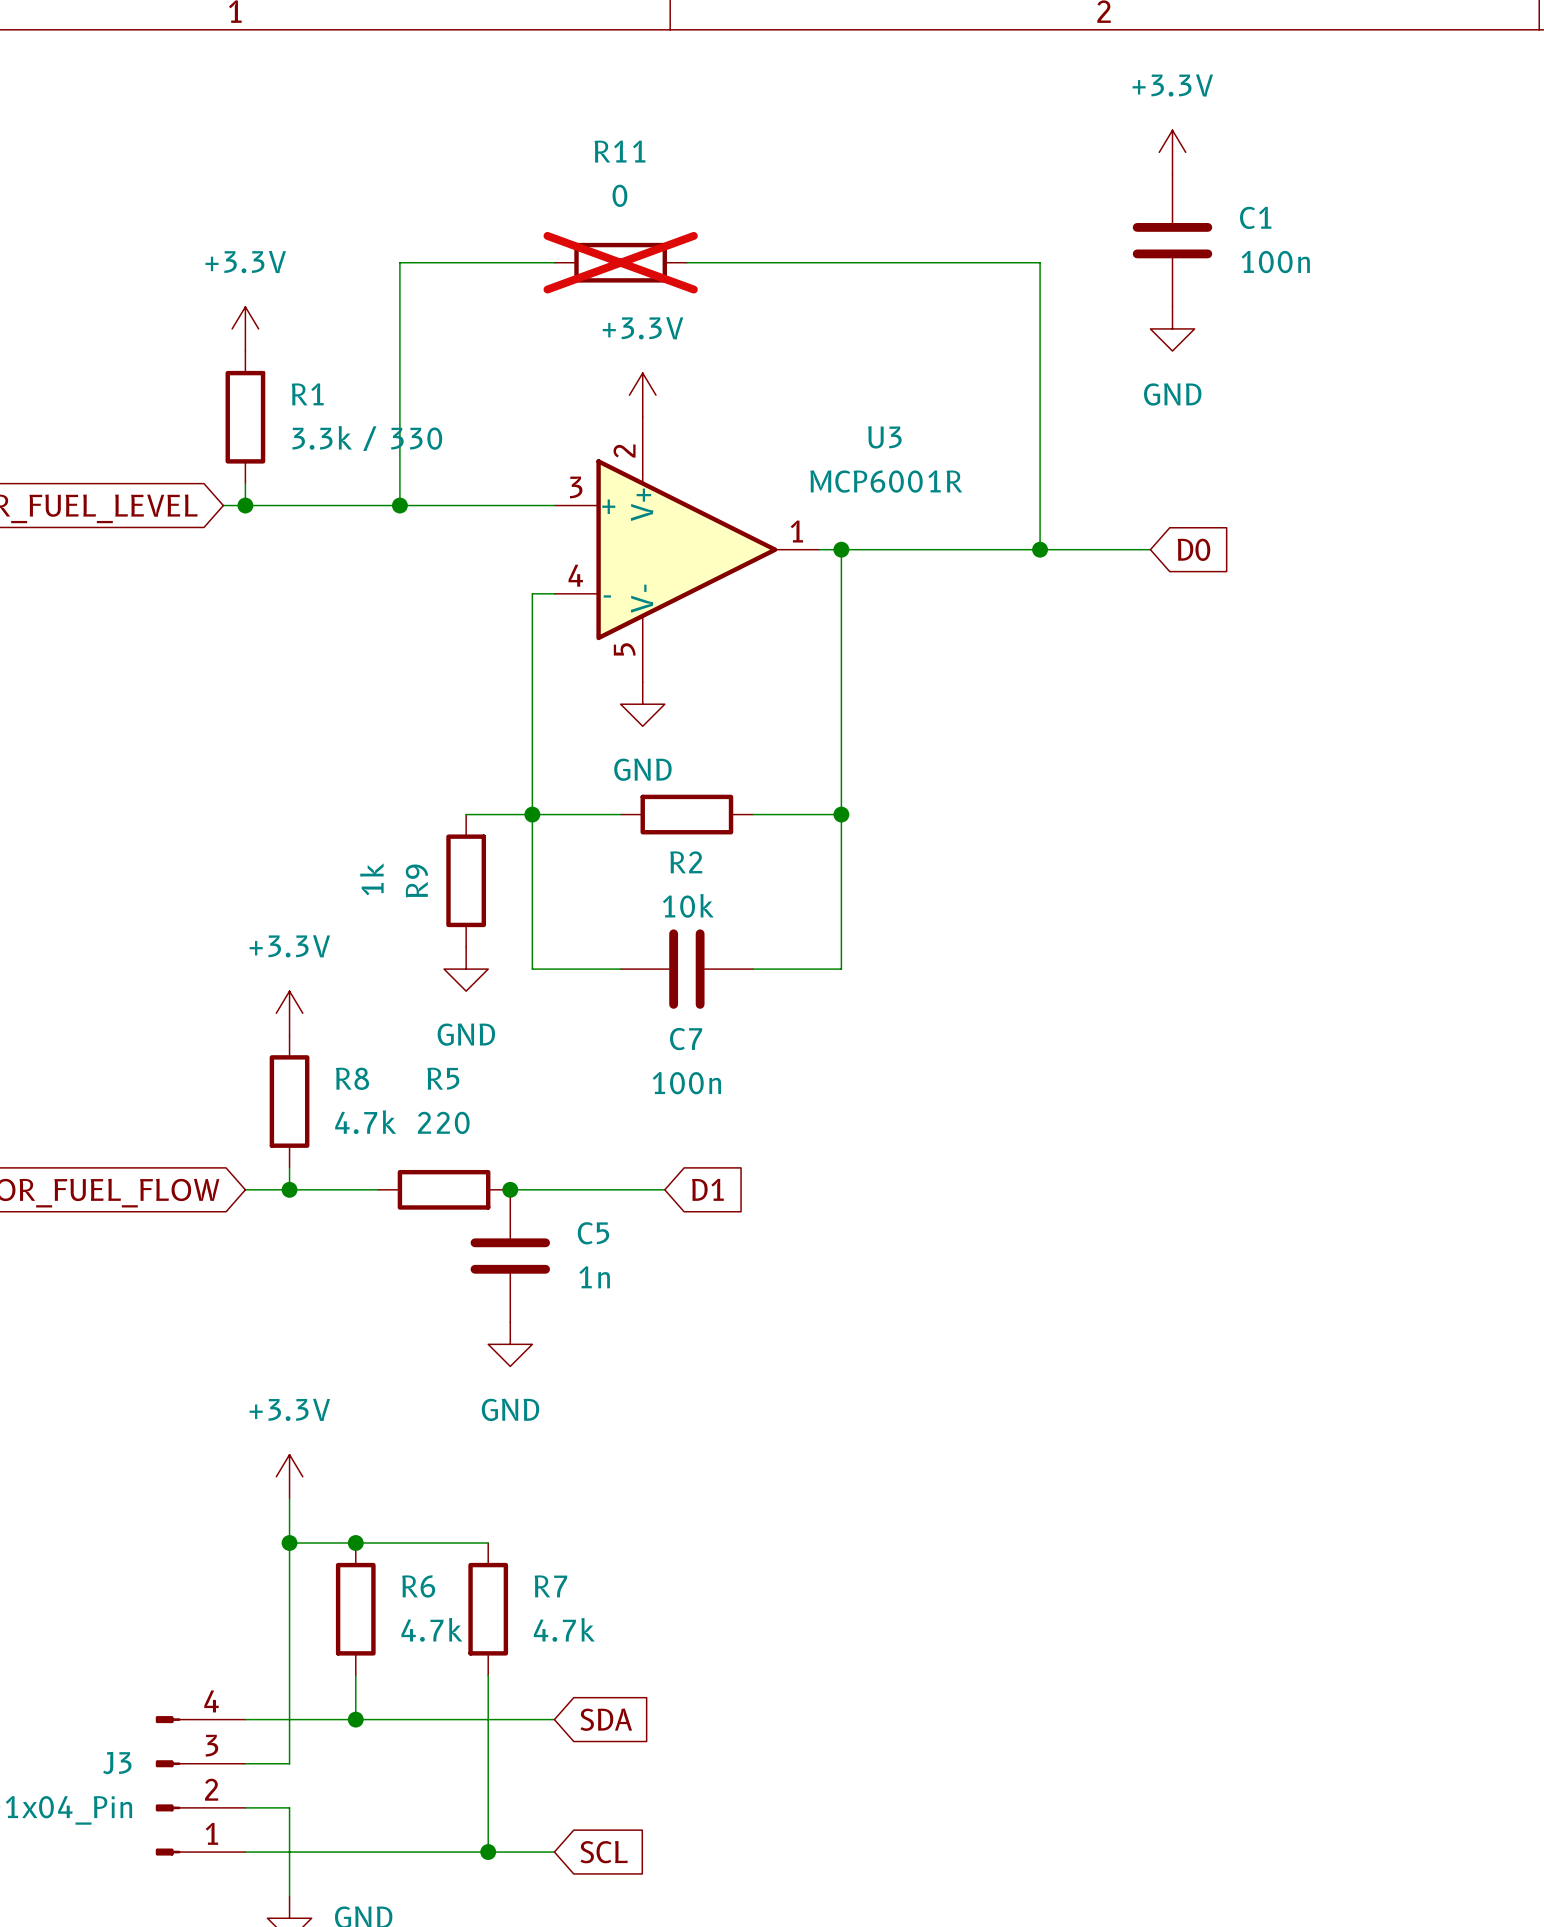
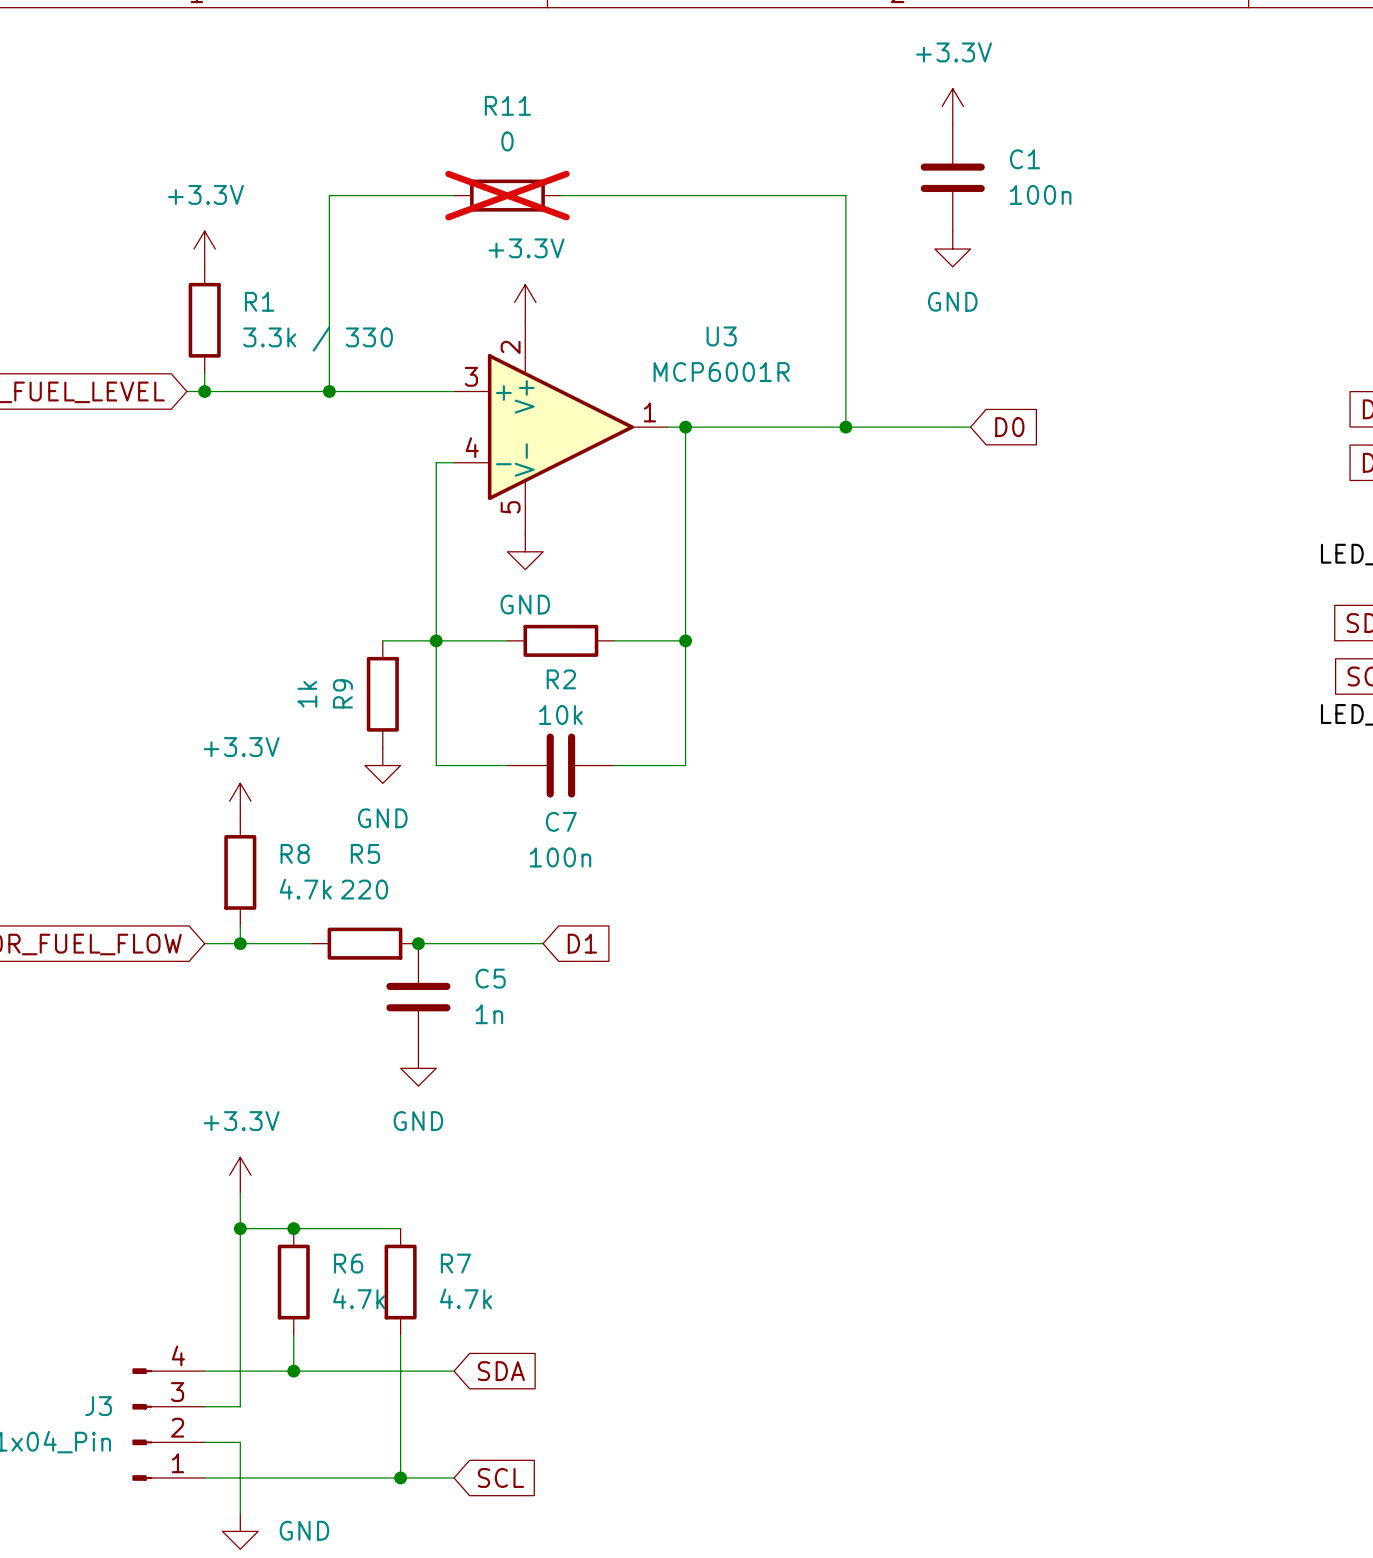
wire: none -> (934, 427) (970, 427)
global label position: D0 (1193, 549) -> D0 (1009, 427)

